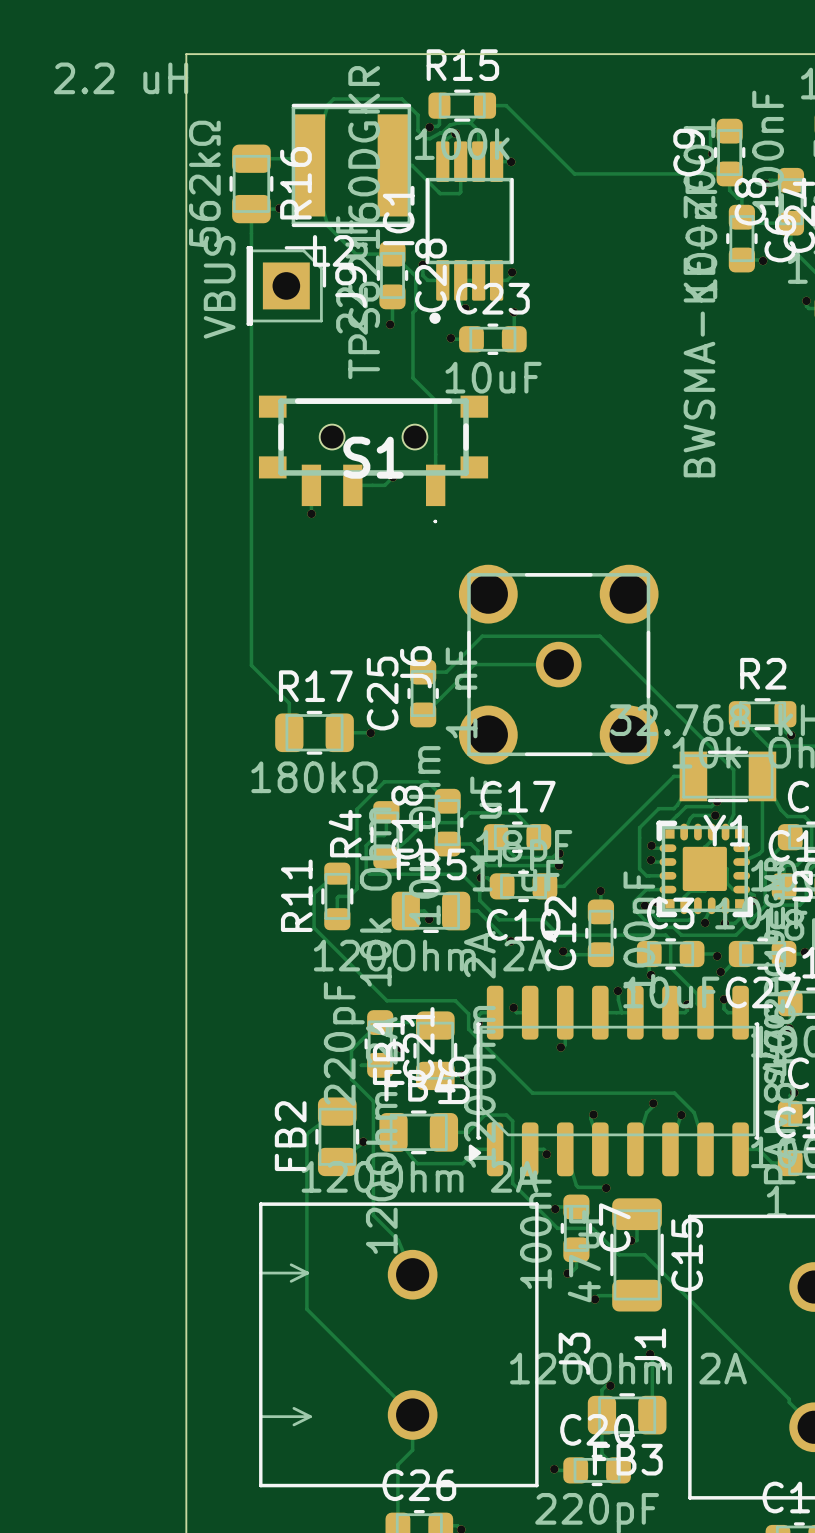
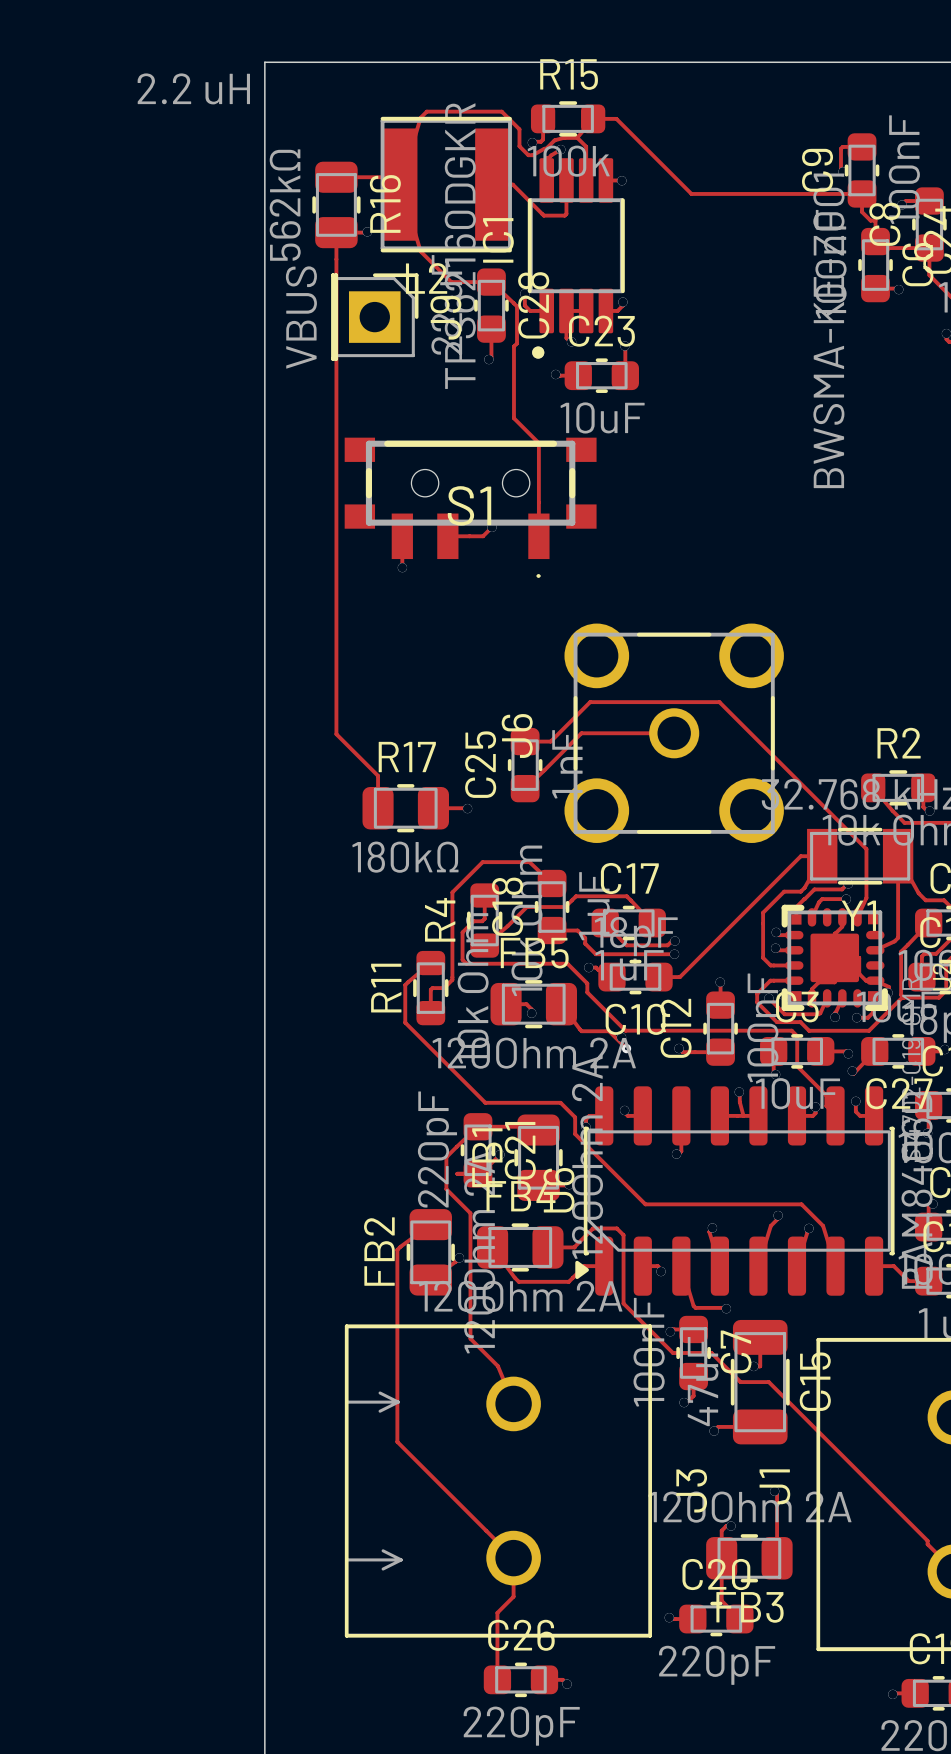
track: (456, 911) (477, 911) (508, 941) (510, 941) -> (561, 1004) (581, 1031) (609, 1031) (626, 1048)
track: (499, 919) (543, 919) (558, 935) -> (608, 1013) (625, 1030) (674, 1030)
via: none -> (626, 1048)

